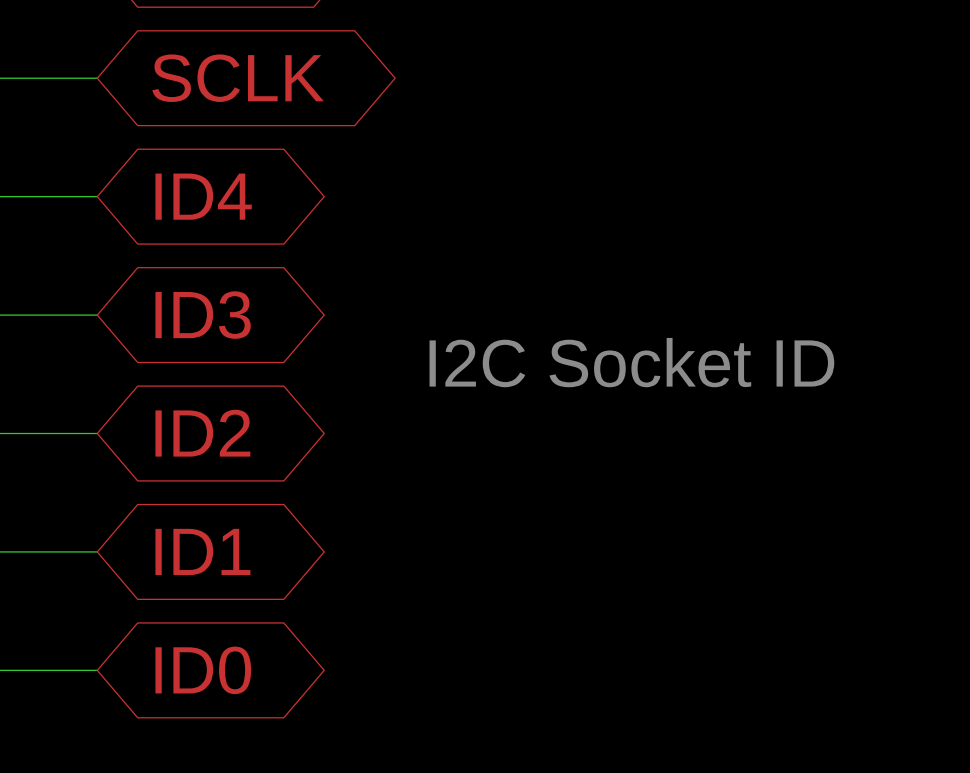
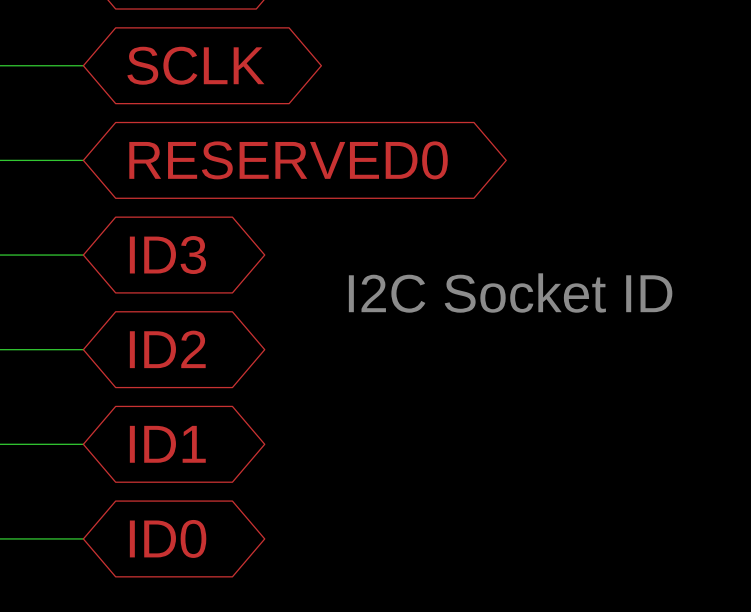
global label: ID4 (203, 196) -> RESERVED0 (288, 160)

